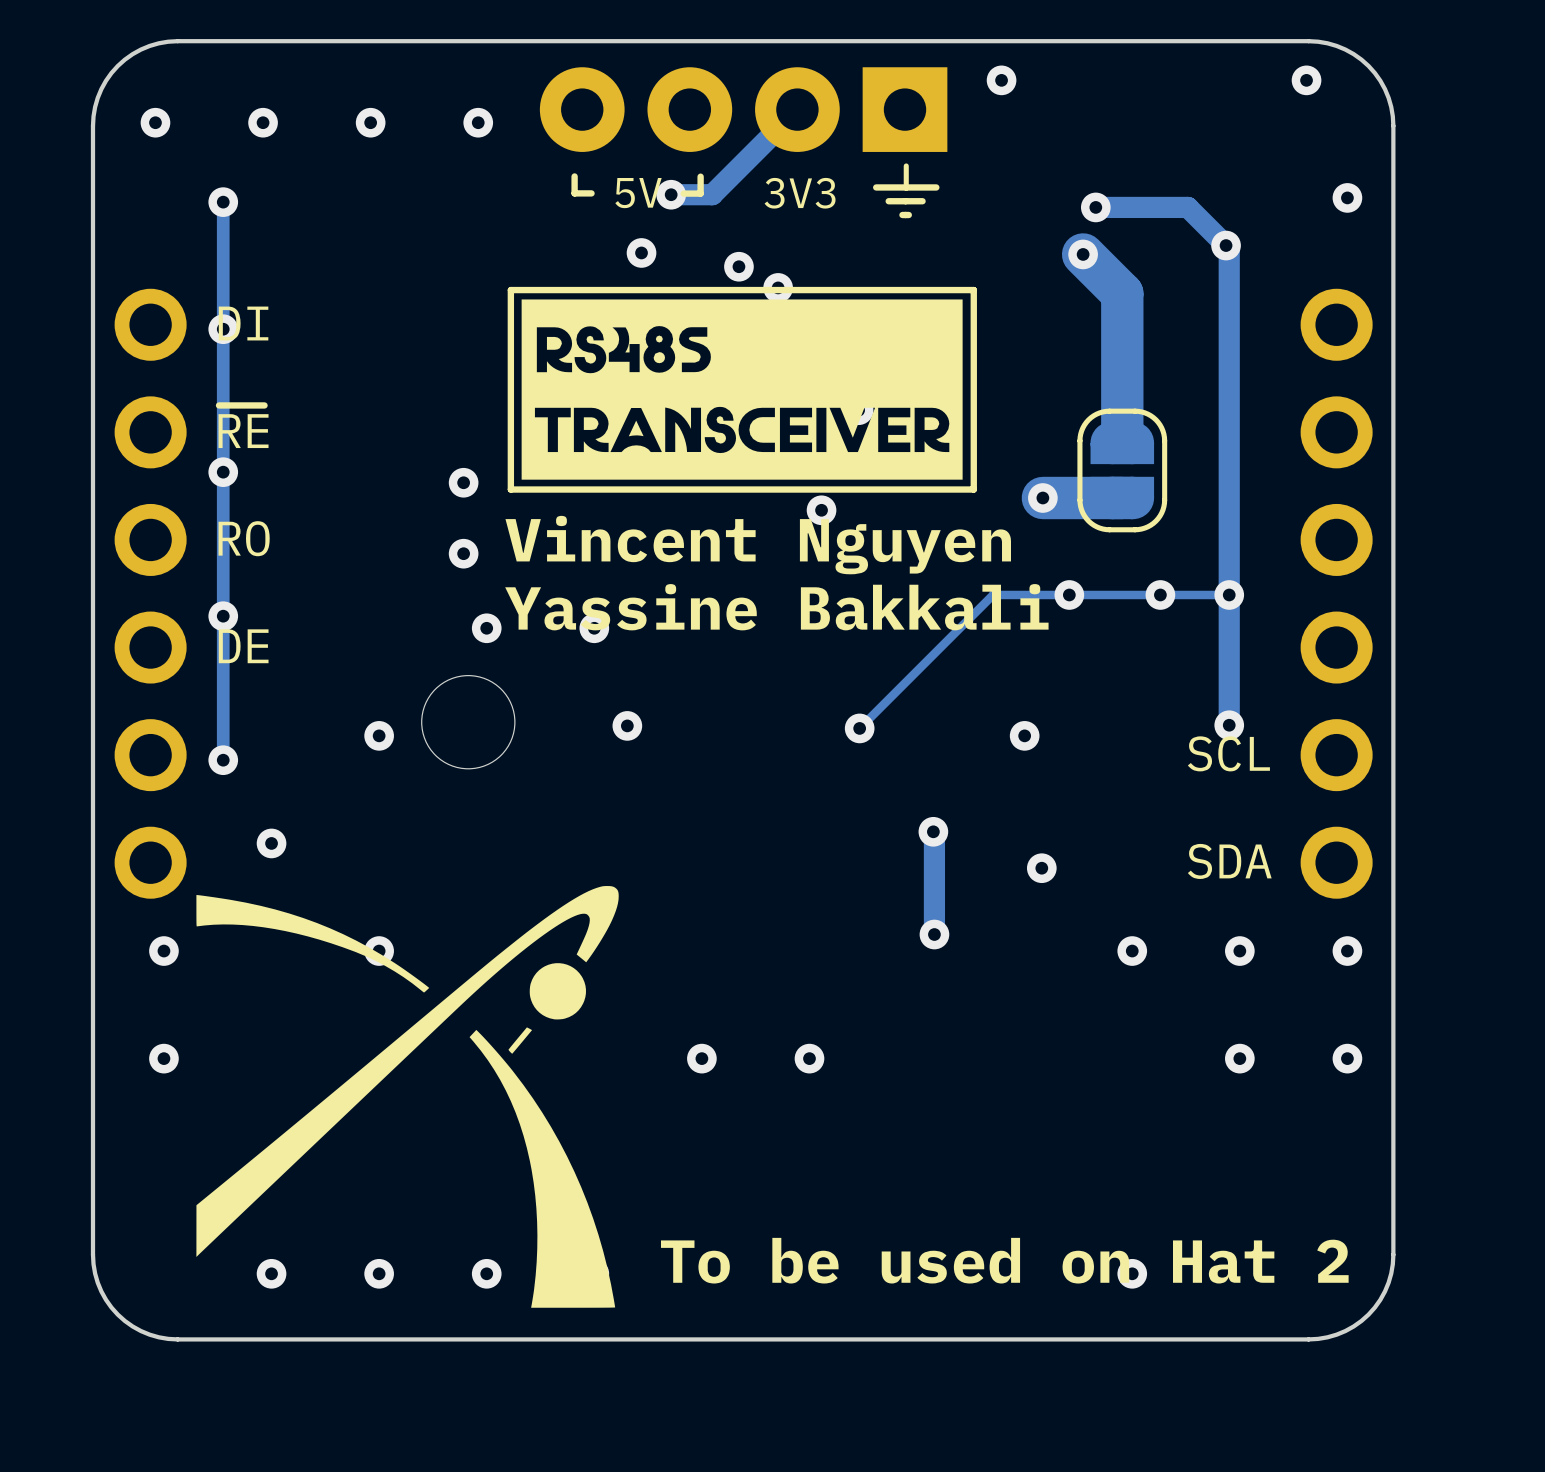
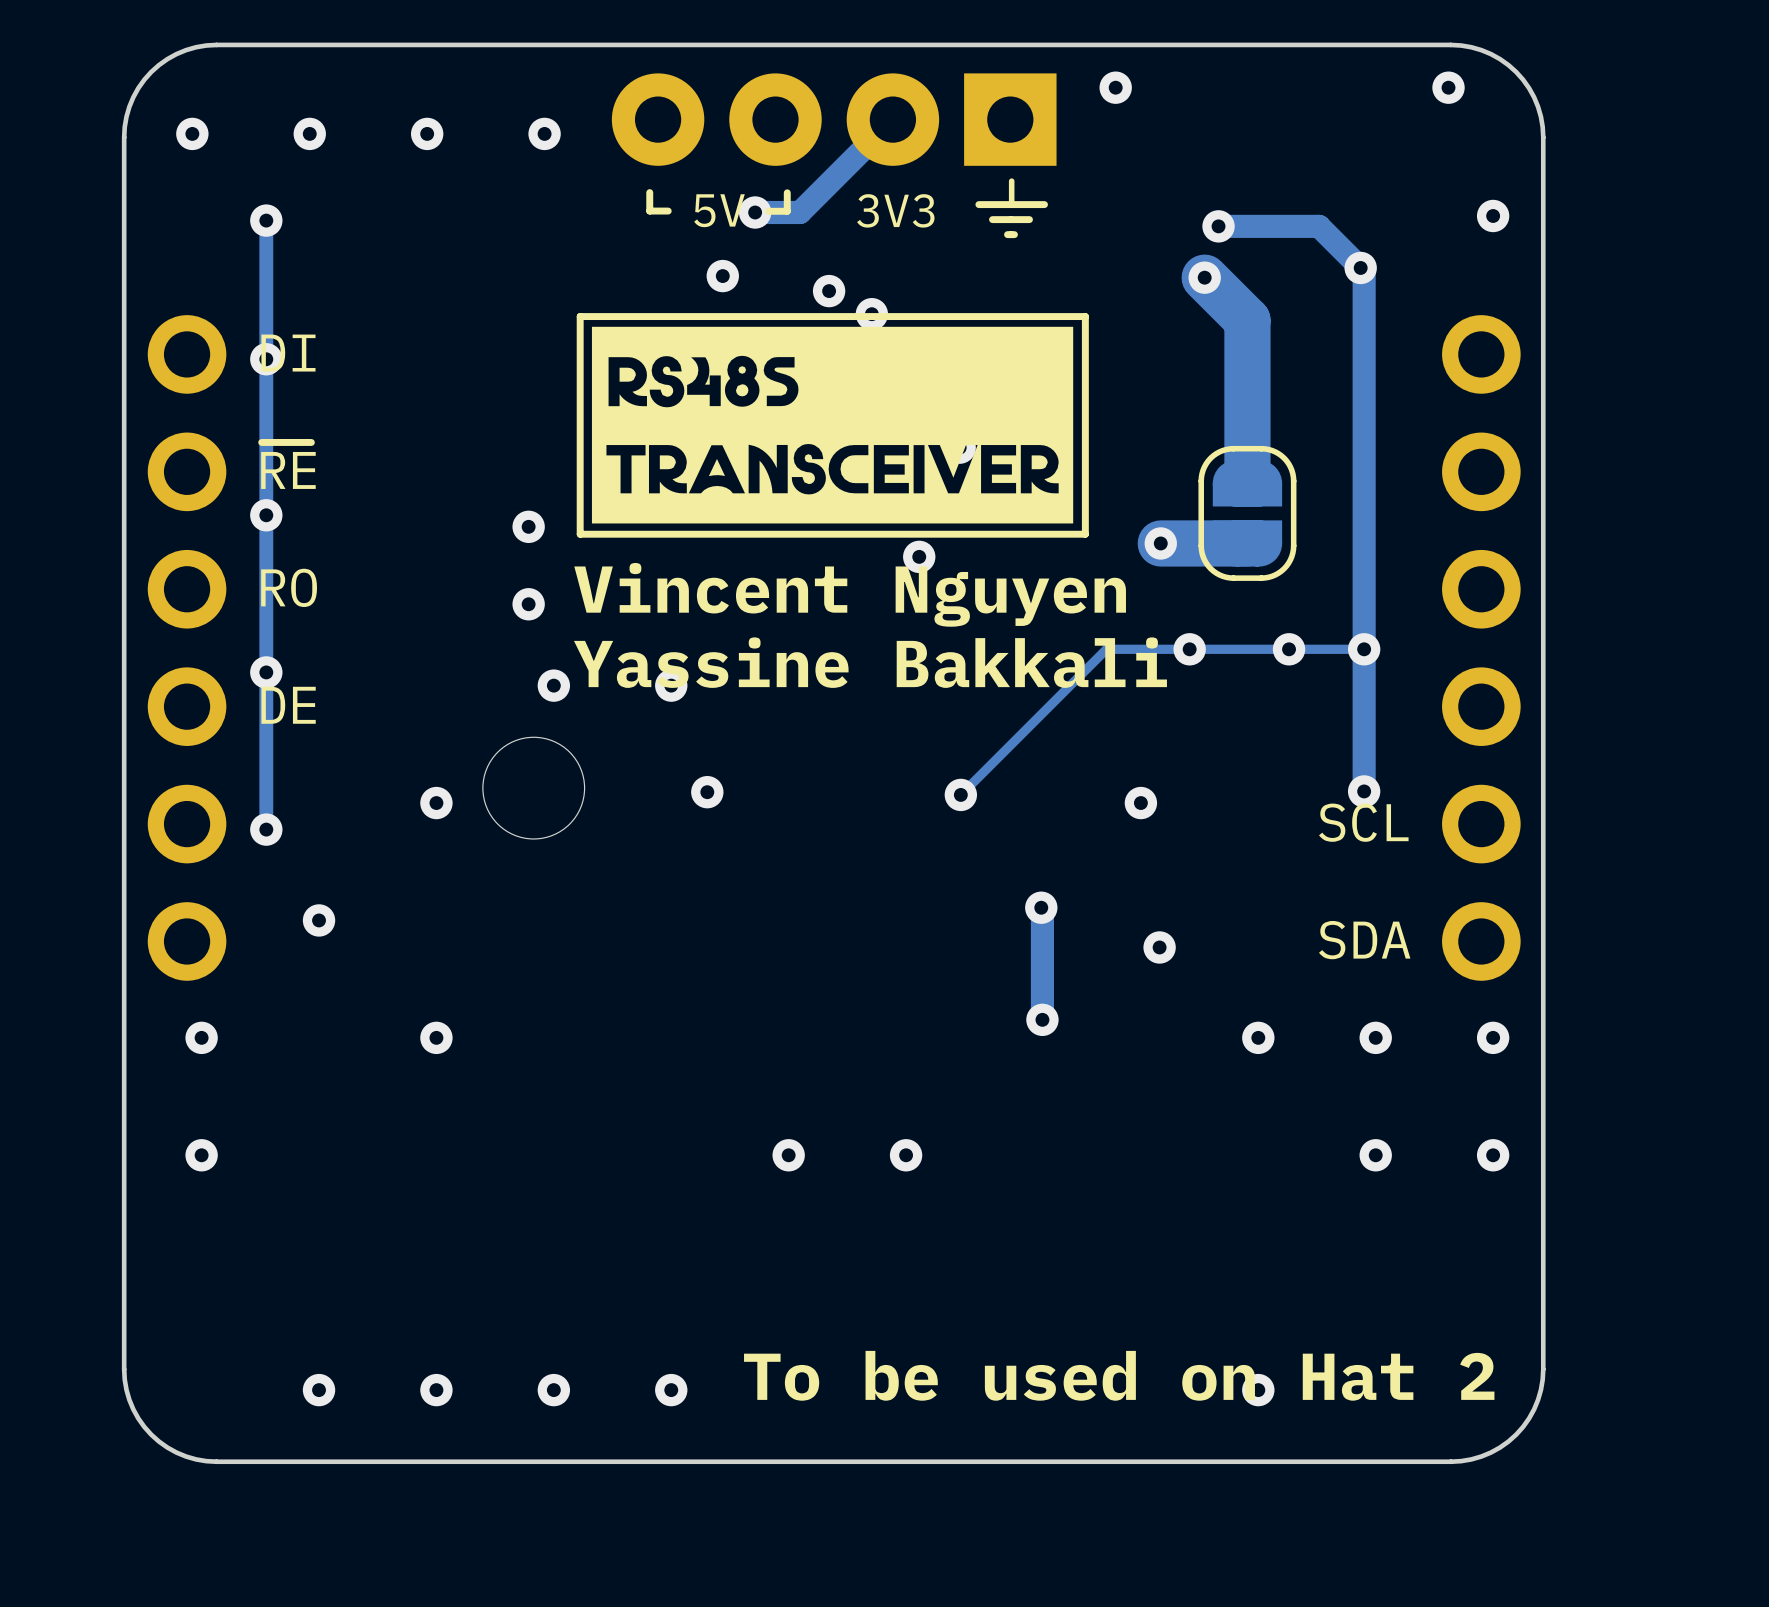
drawing: [196, 886, 619, 1308] -> none

